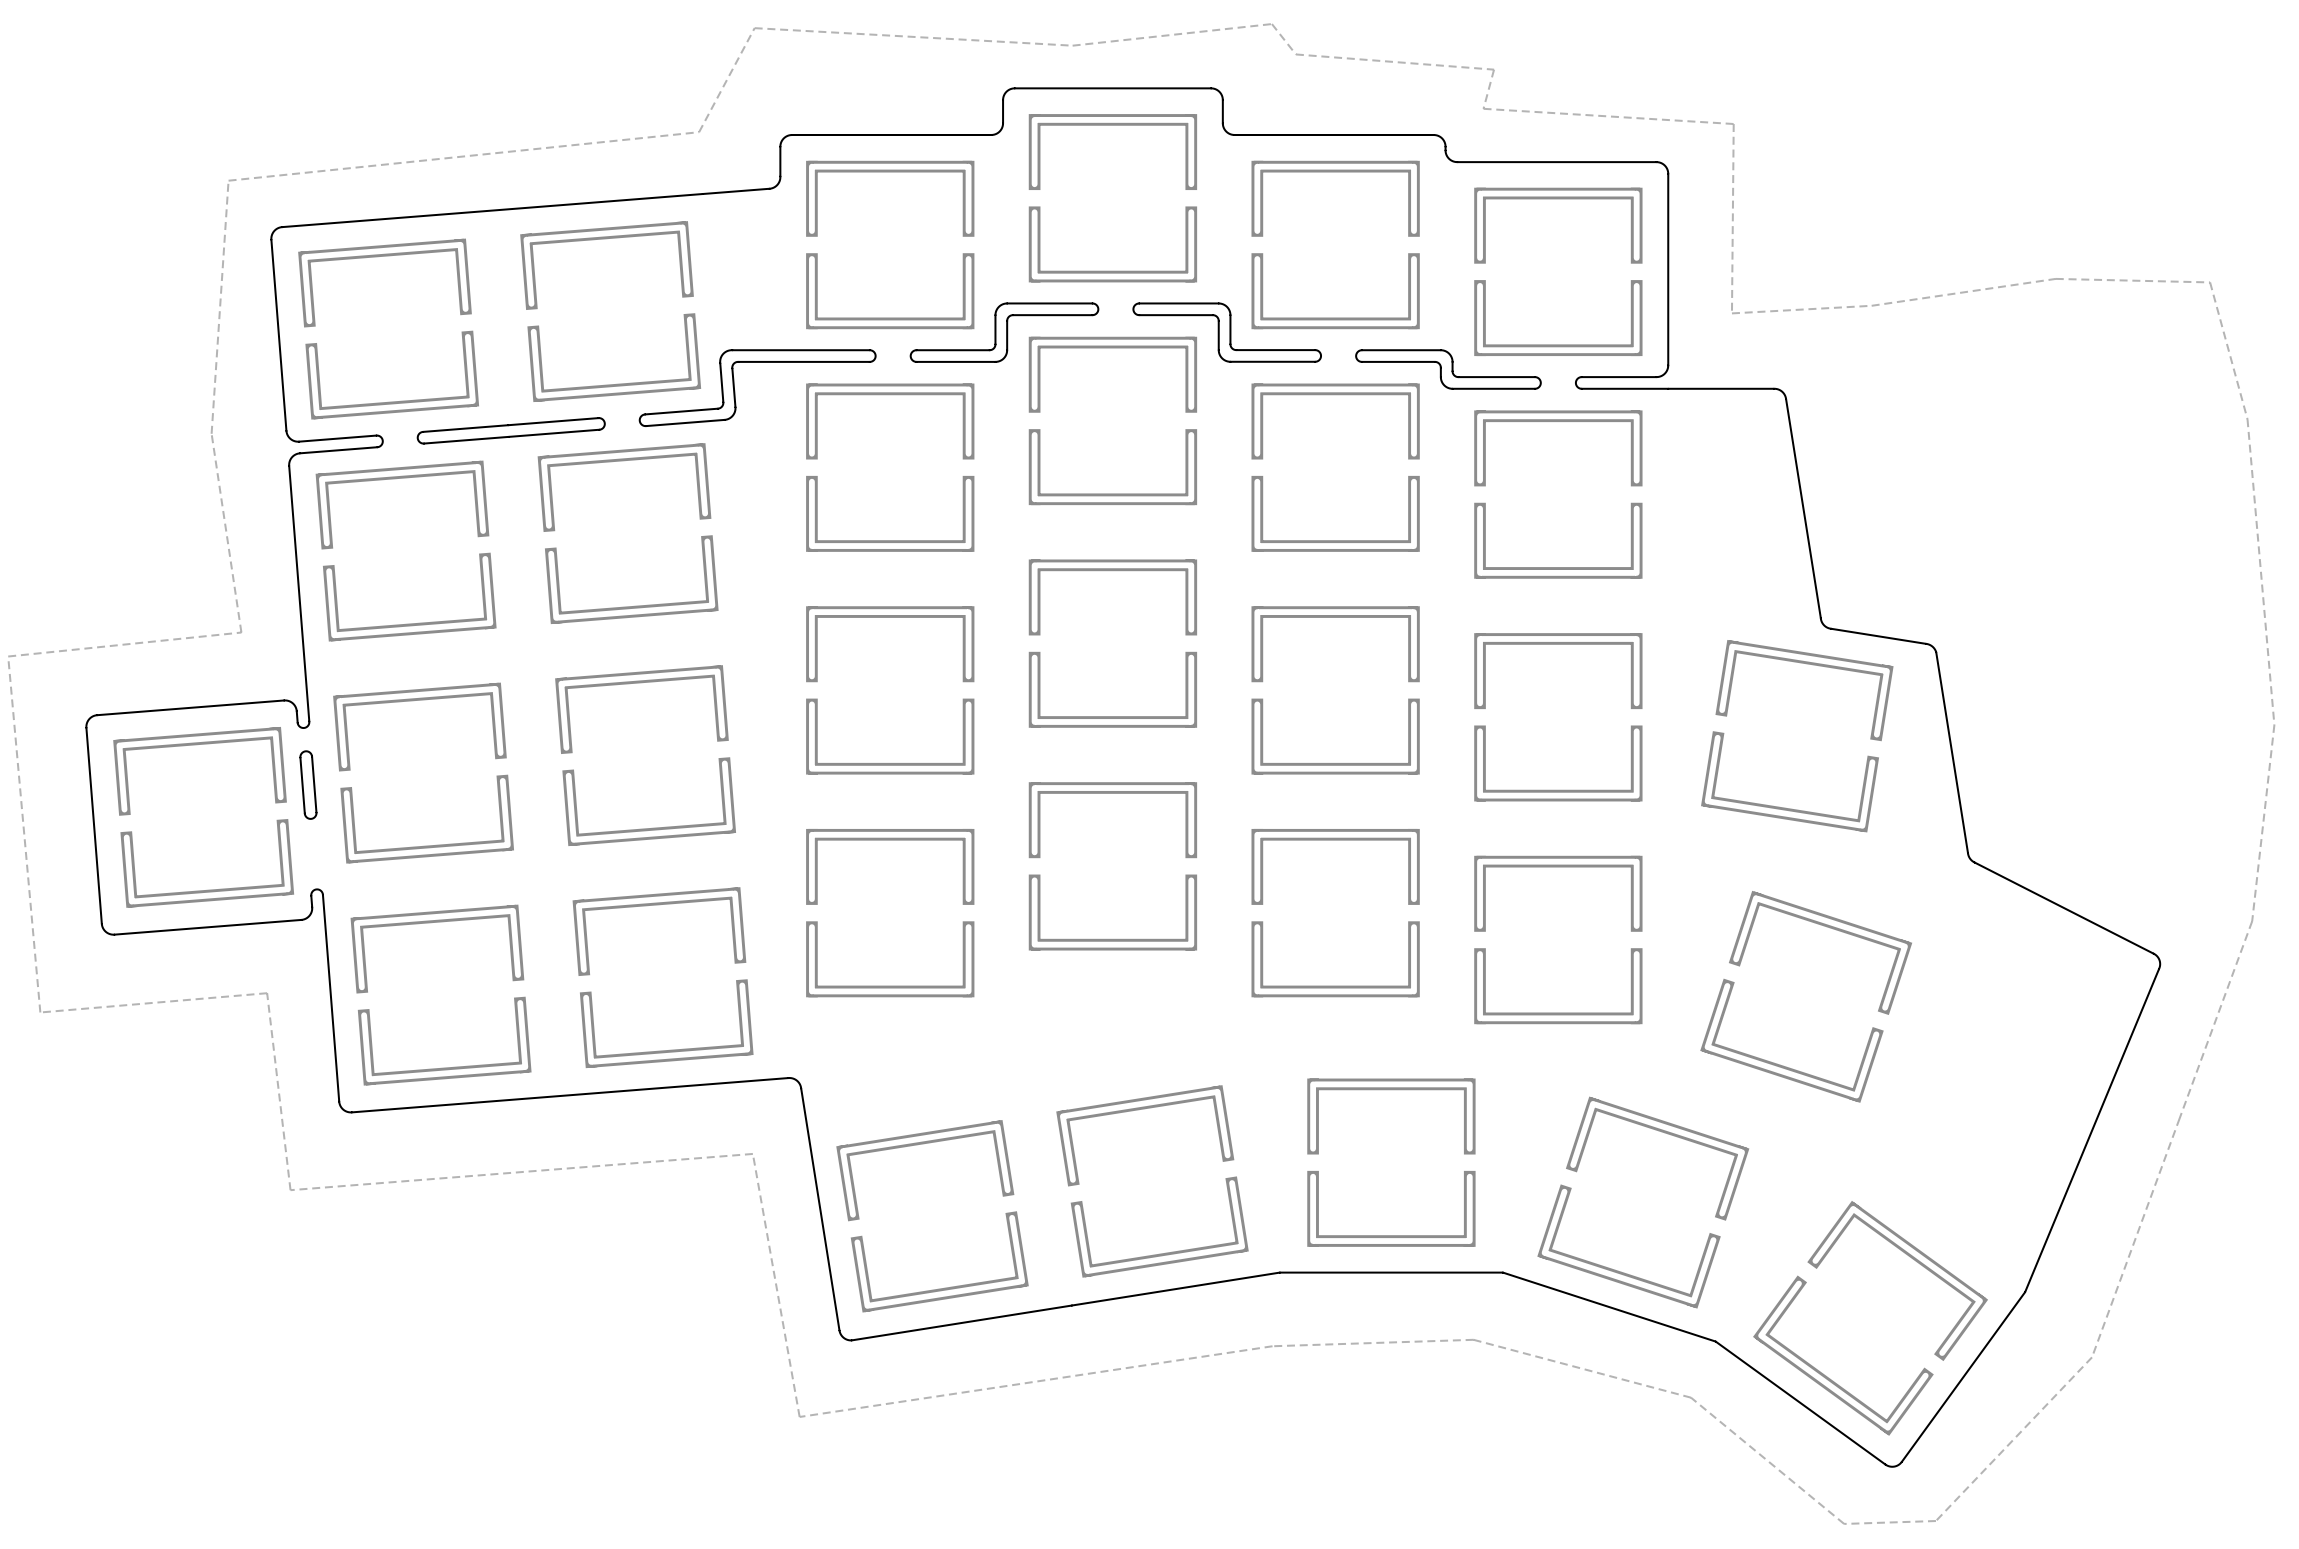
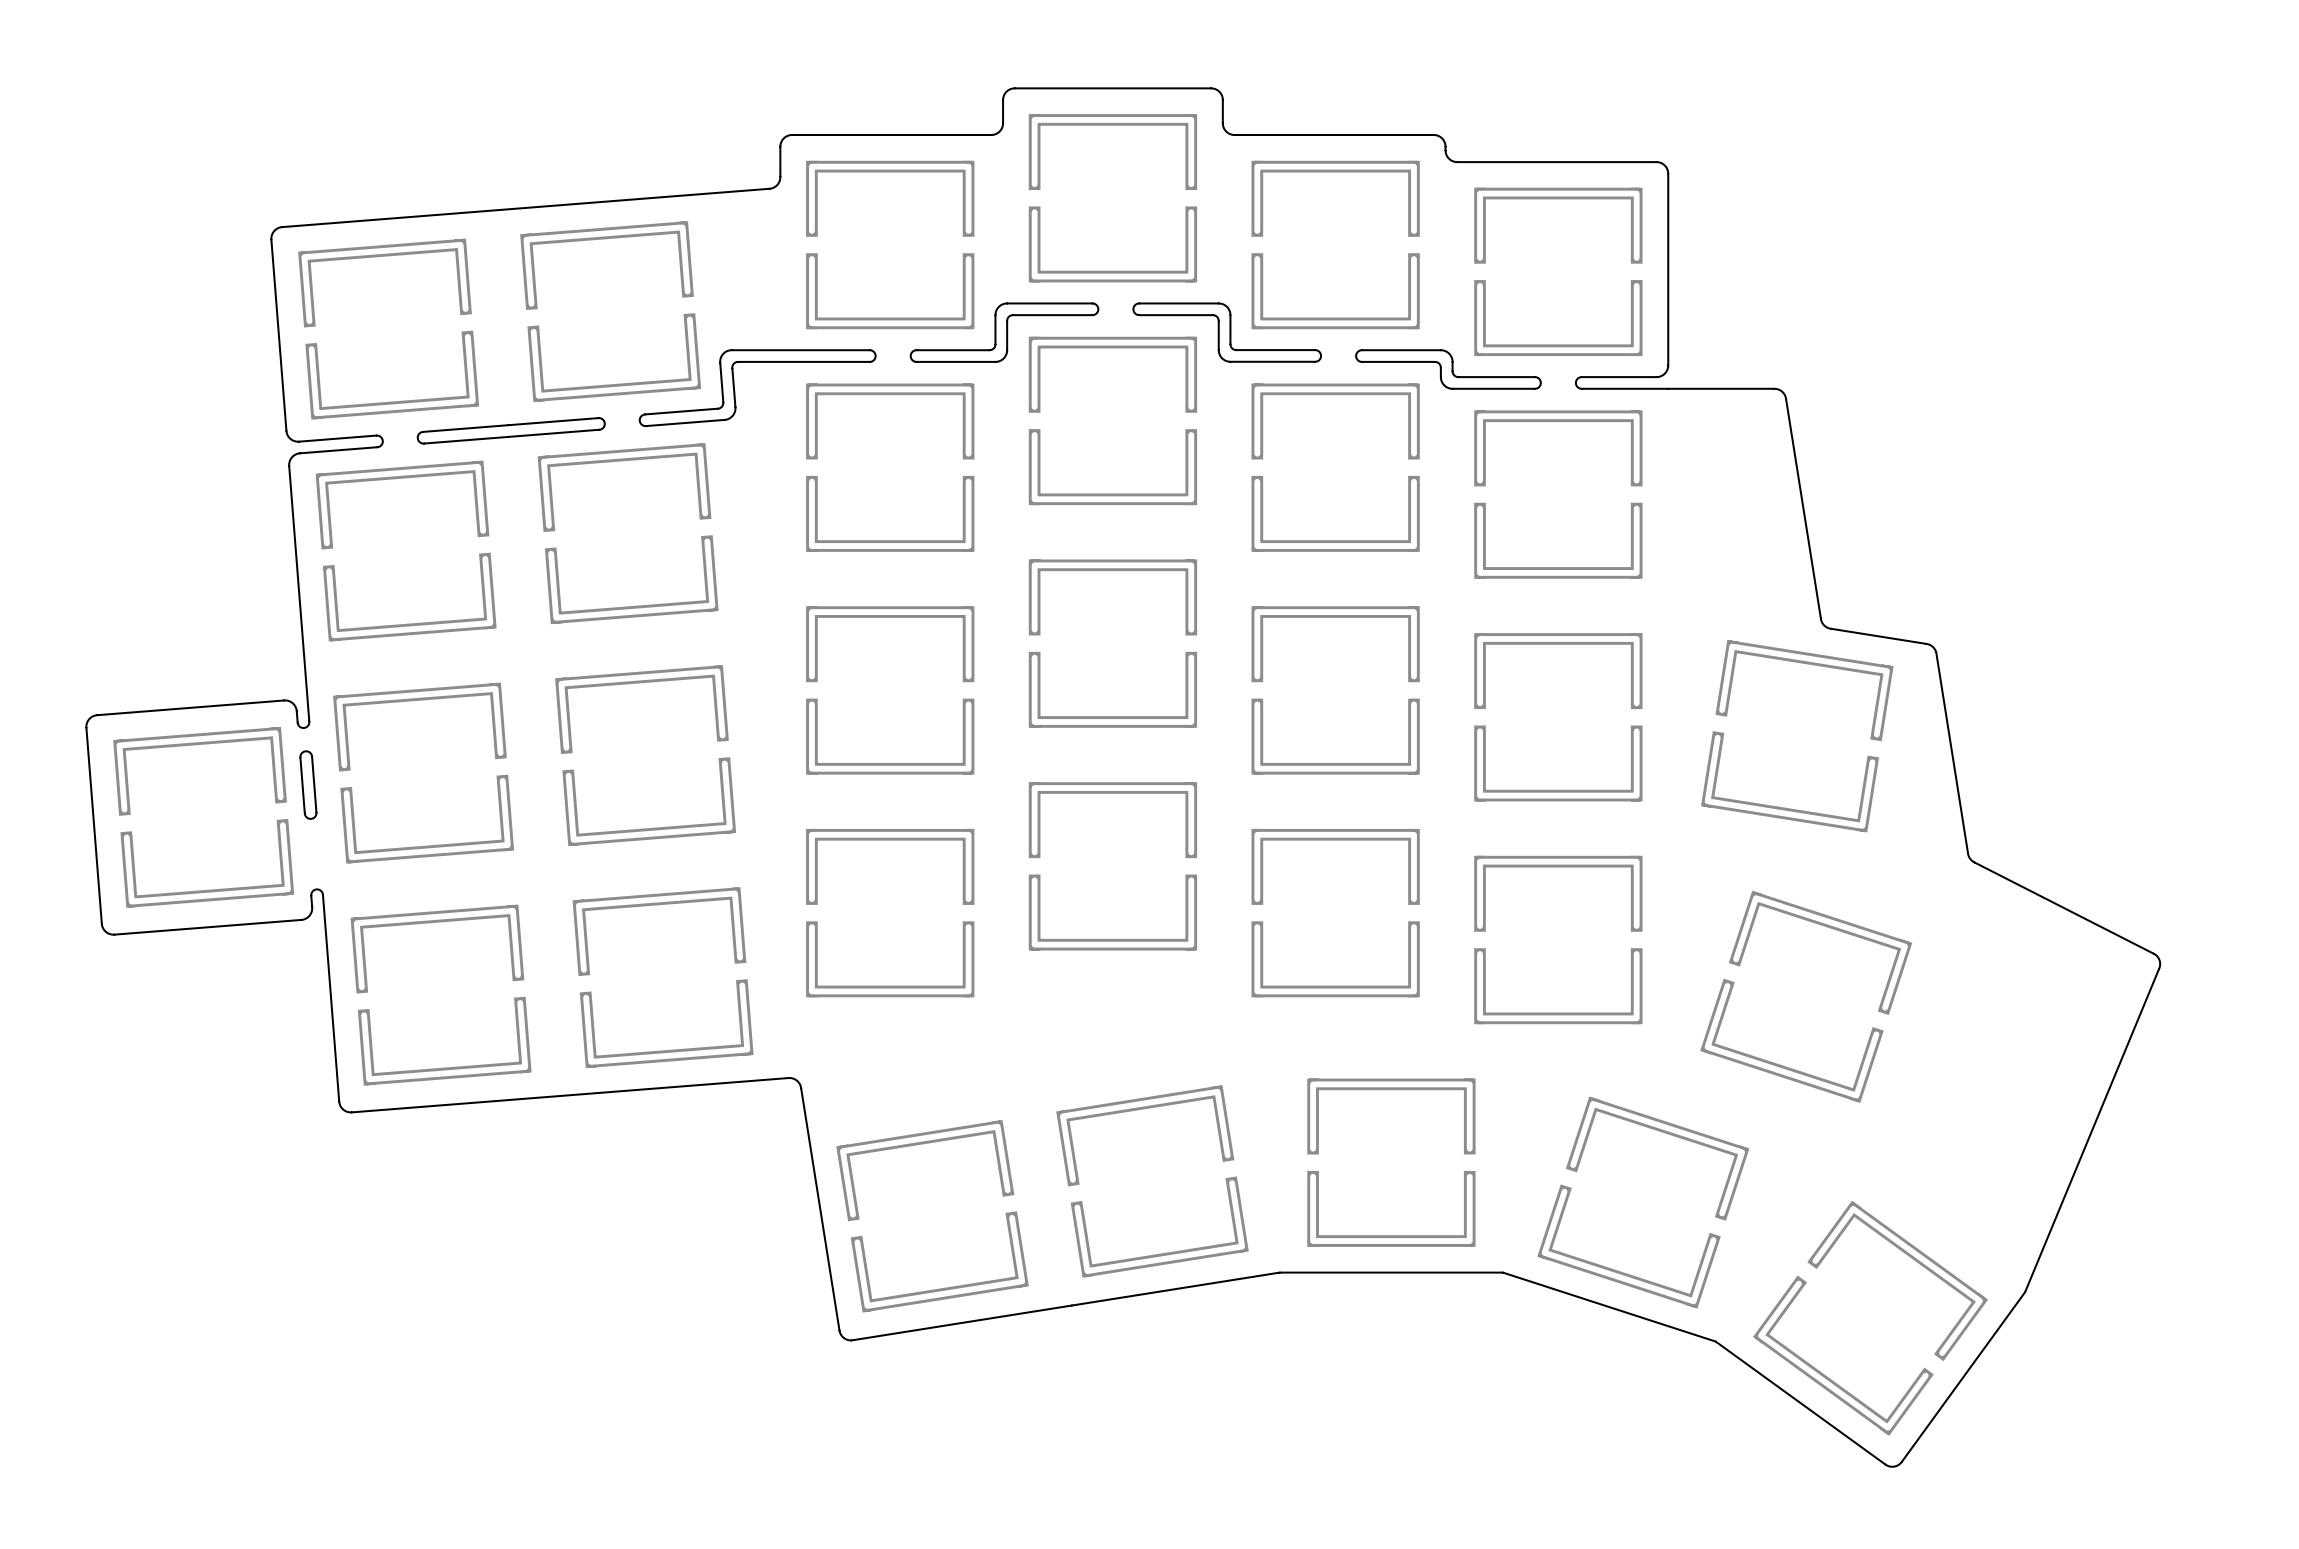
zone outline: (1271, 24) (1072, 45) (754, 28) (699, 132) (228, 180) (211, 433) (241, 632) (8, 656) (40, 1012) (267, 993) (290, 1190) (752, 1153) (799, 1416) (1272, 1346) (1473, 1339) (1691, 1397) (1844, 1523) (1935, 1521) (2092, 1357) (2252, 921) (2274, 724) (2247, 419) (2210, 282) (2055, 278) (1871, 305) (1731, 313) (1733, 124) (1483, 108) (1494, 69) (1295, 54) (1271, 24) -> none

